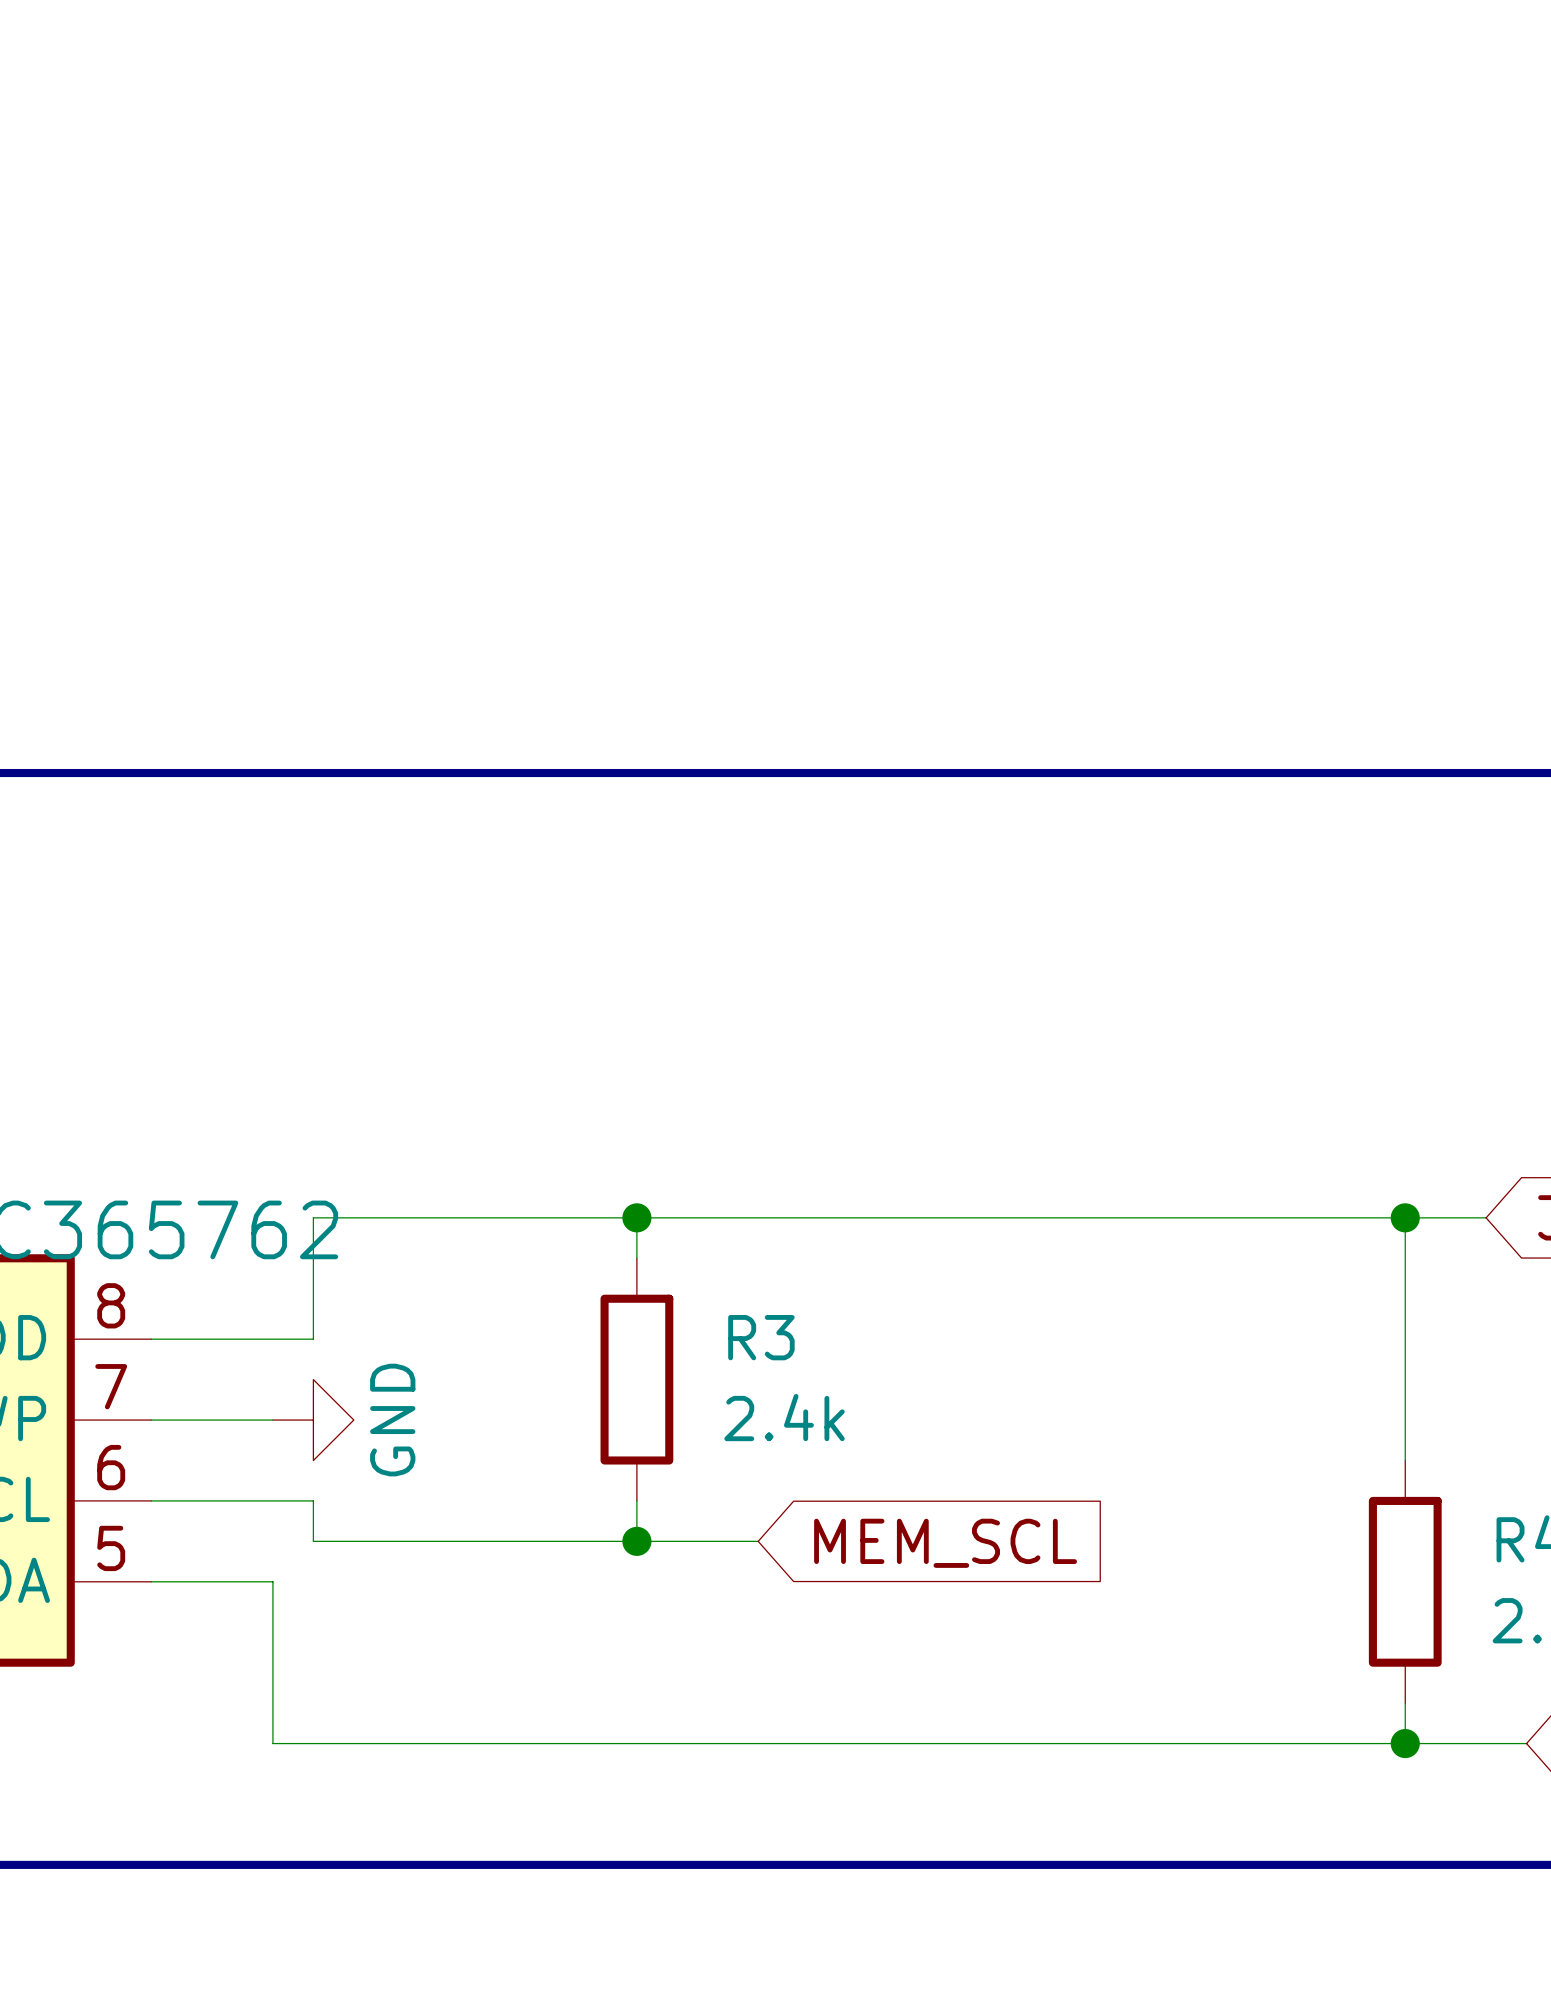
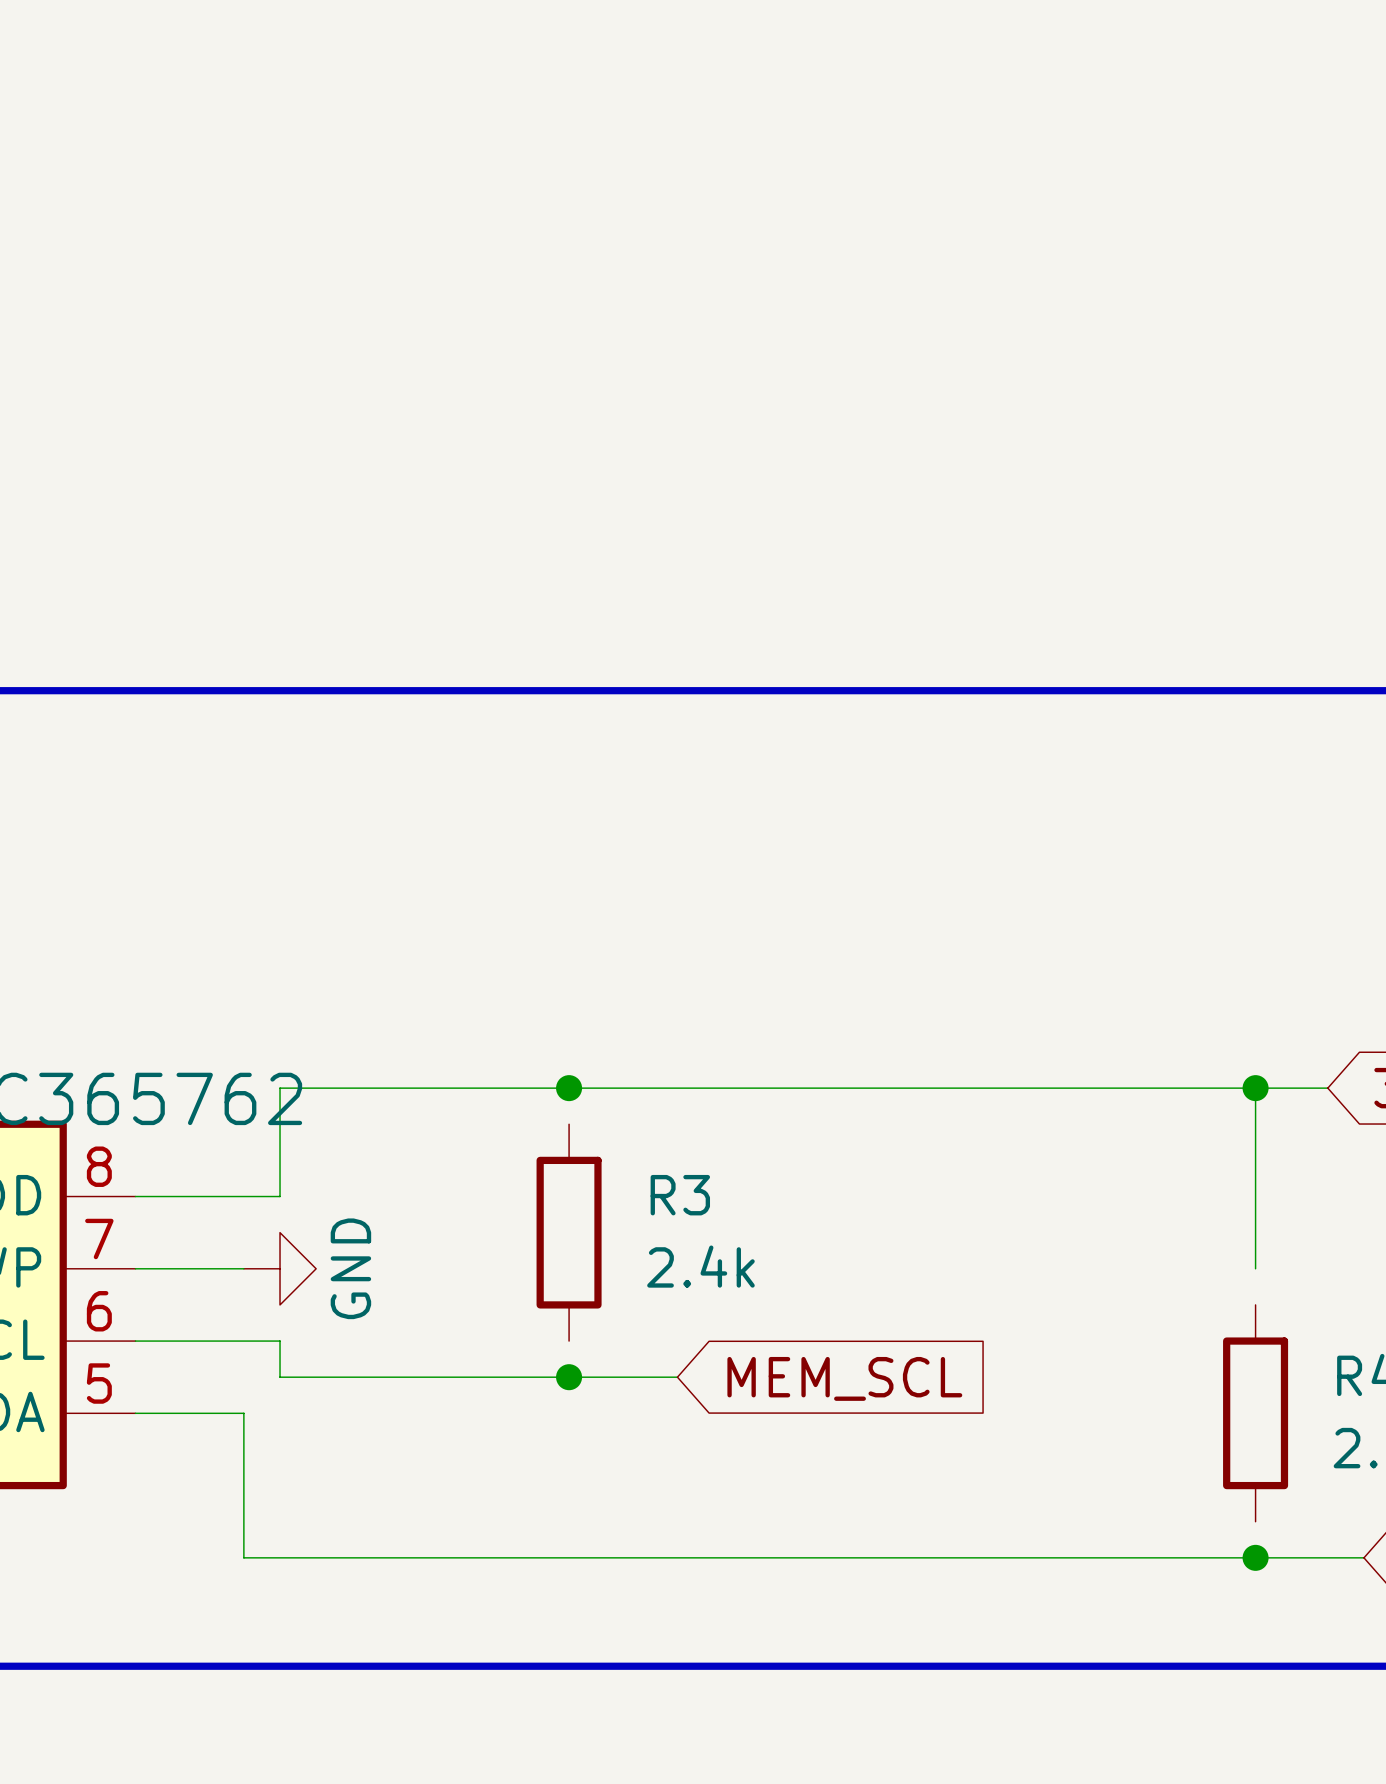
wire: (636, 1217) (636, 1258) -> none
wire: (1405, 1420) (1405, 1460) -> none
wire: (636, 1500) (636, 1541) -> none
wire: (1405, 1703) (1405, 1743) -> none

